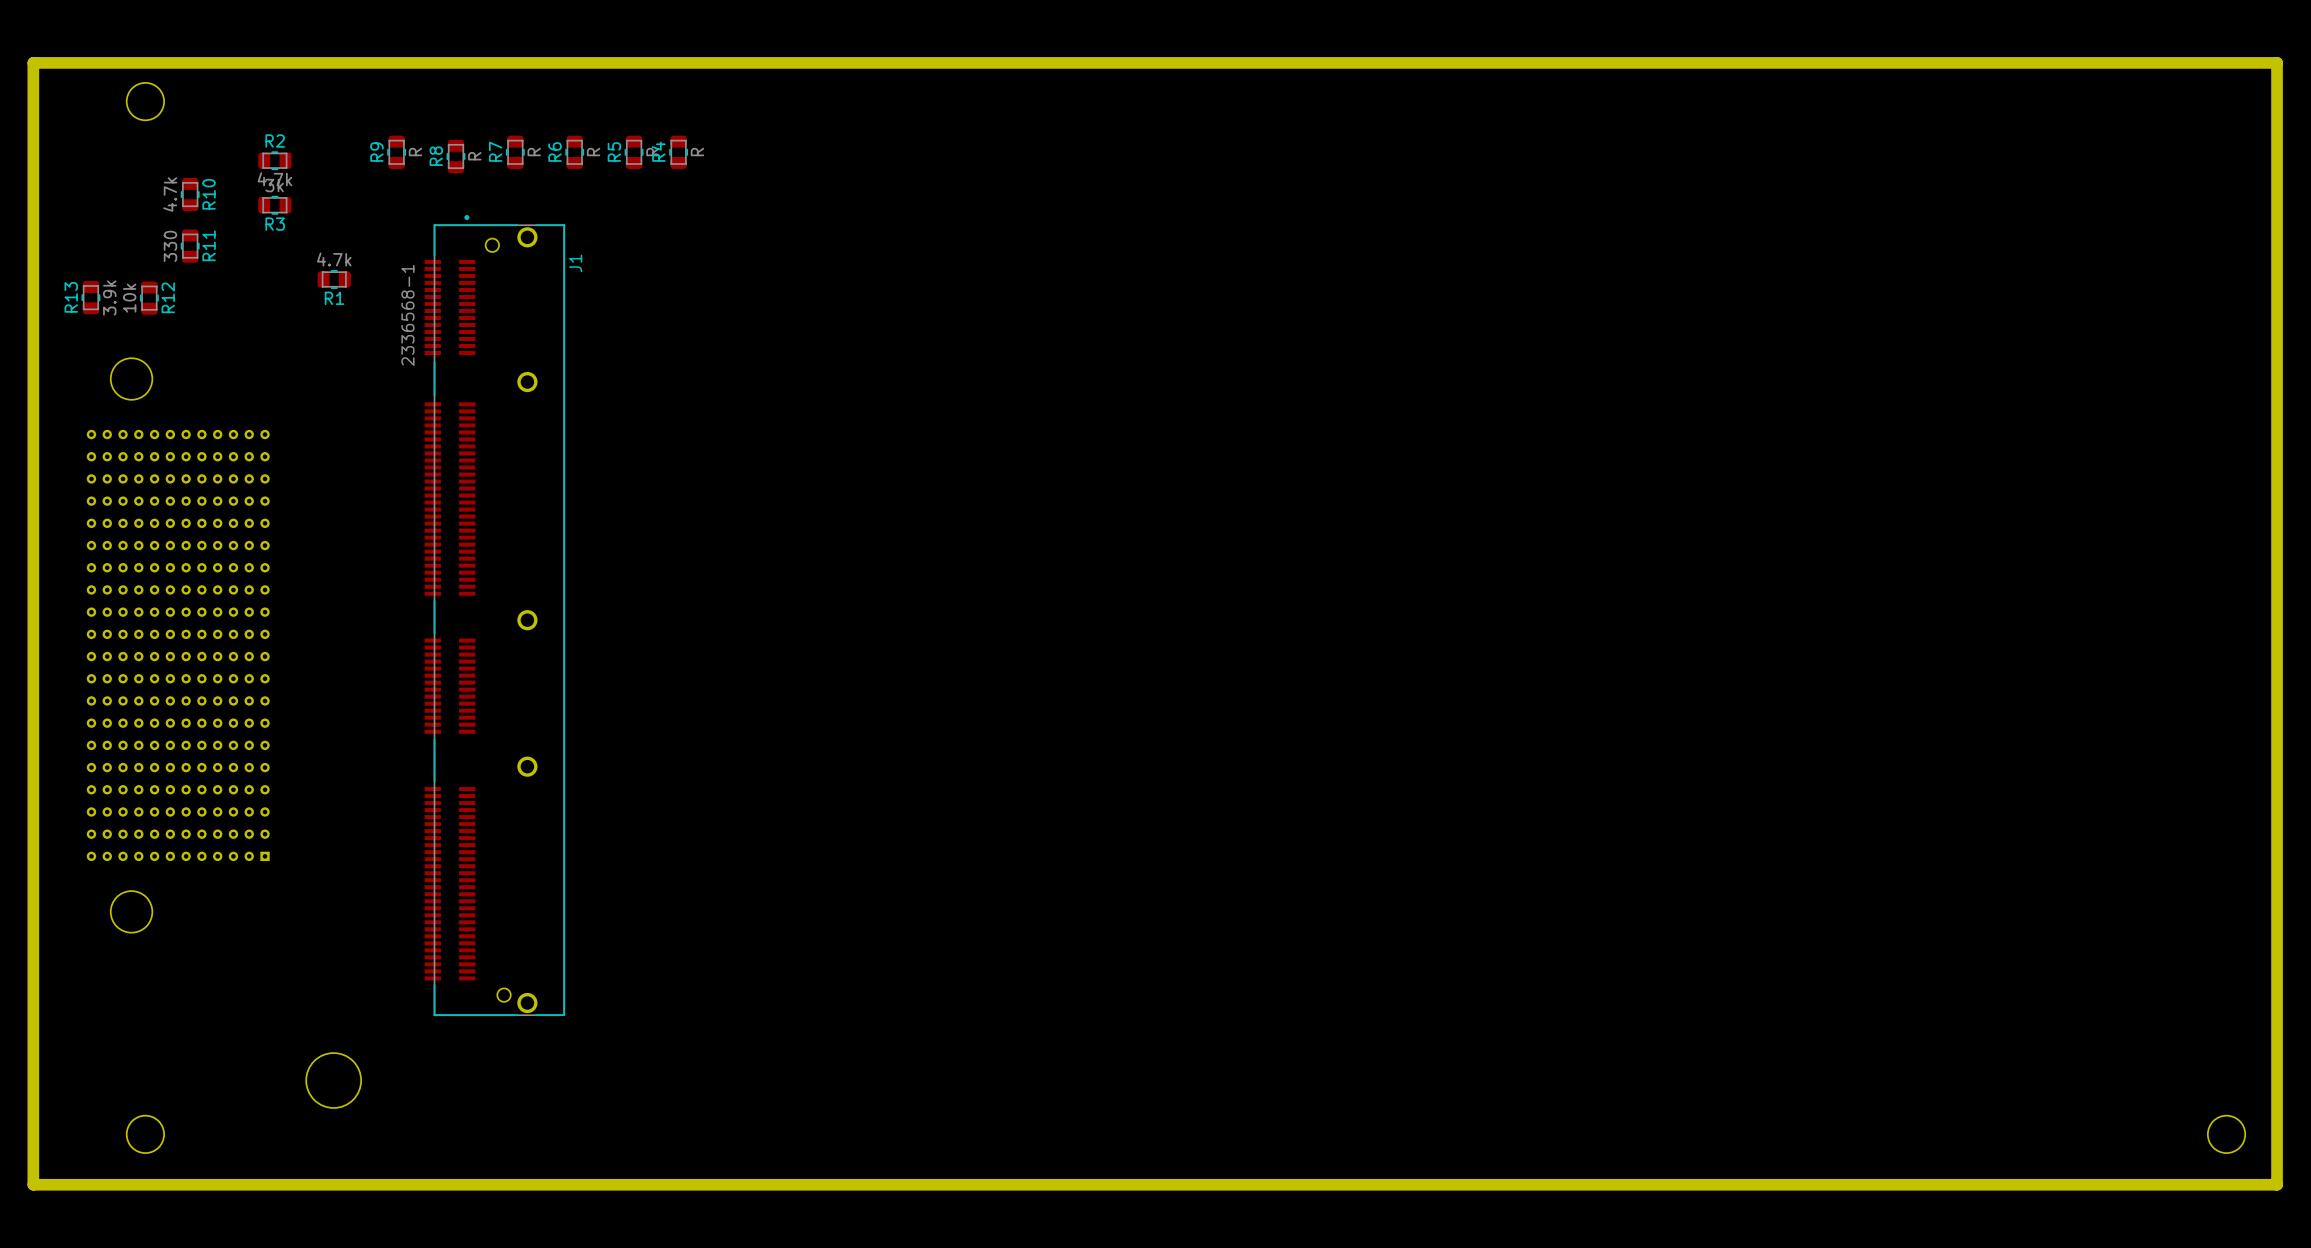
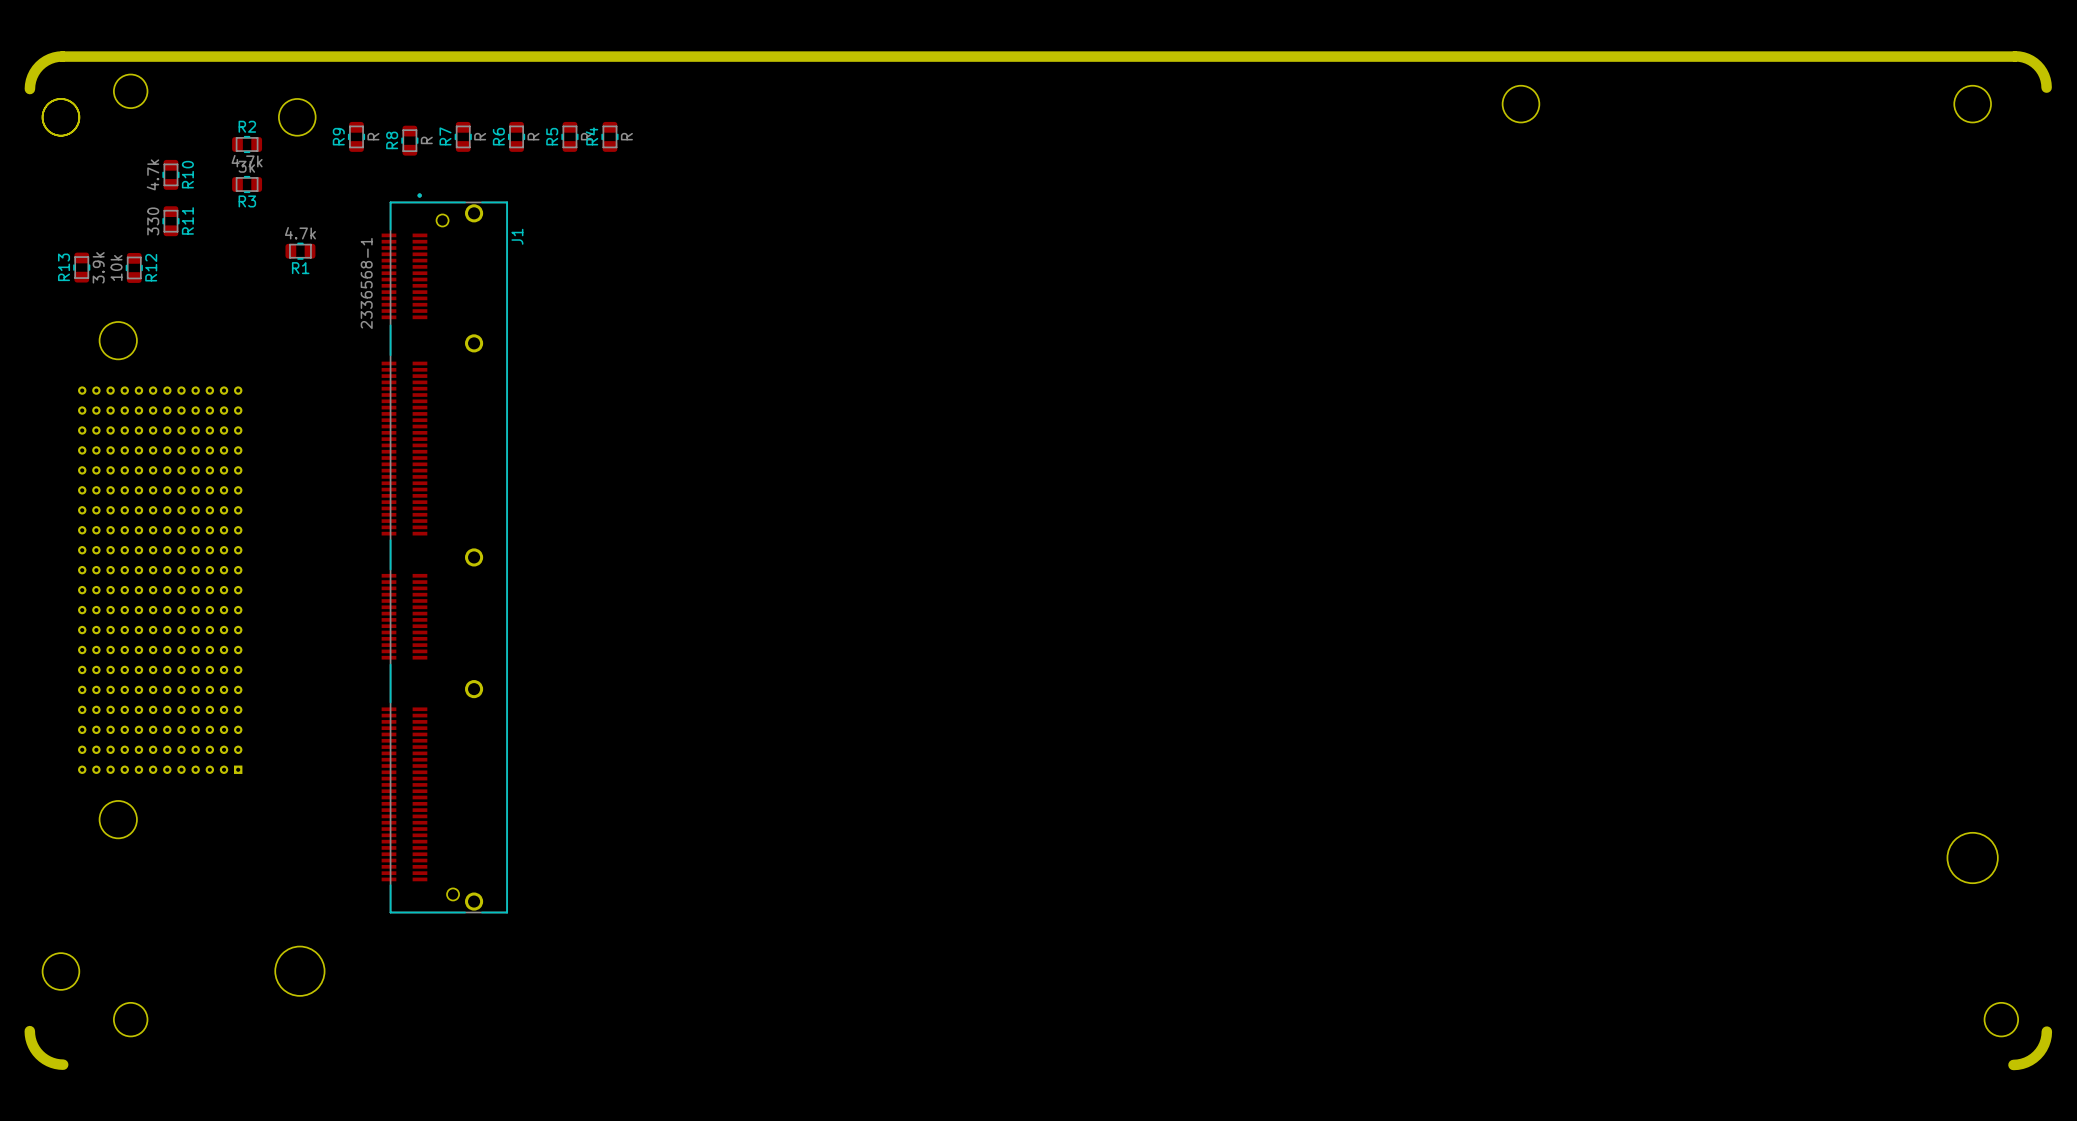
board edge: (69, 62) (33, 62) (33, 1184) (2277, 1184) (2277, 62) (2241, 62) -> (62, 56) (50, 58) (39, 65) (32, 76) (29, 89)
board edge: none -> (2015, 56) (2027, 58) (2037, 65) (2044, 75) (2046, 87)
round board edge: none -> [1502, 85, 1540, 124]
round board edge: none -> [1953, 85, 1992, 124]
round board edge: none -> [42, 98, 80, 137]
round board edge: none -> [278, 98, 317, 137]
round board edge: none -> [1946, 832, 1999, 884]
round board edge: none -> [42, 952, 80, 991]
board edge: none -> (29, 1031) (33, 1045) (39, 1054) (48, 1061) (63, 1064)
board edge: none -> (2046, 1031) (2044, 1044) (2037, 1055) (2026, 1062) (2013, 1064)

